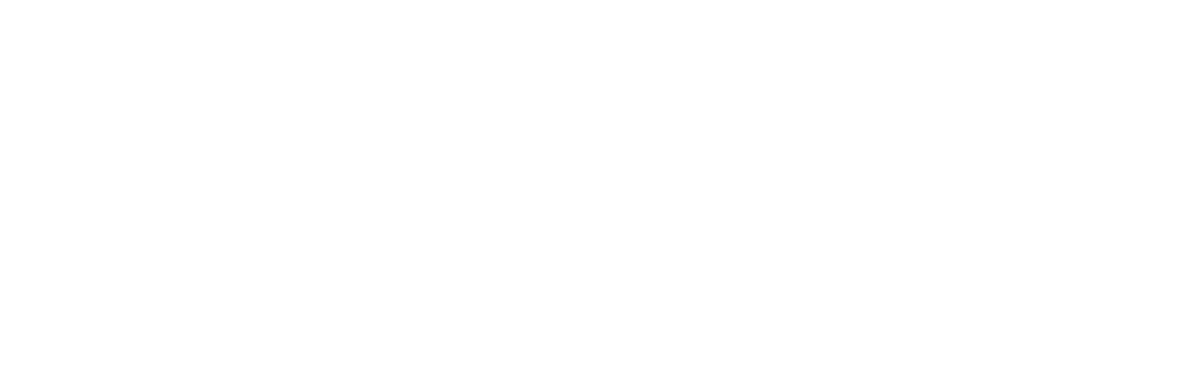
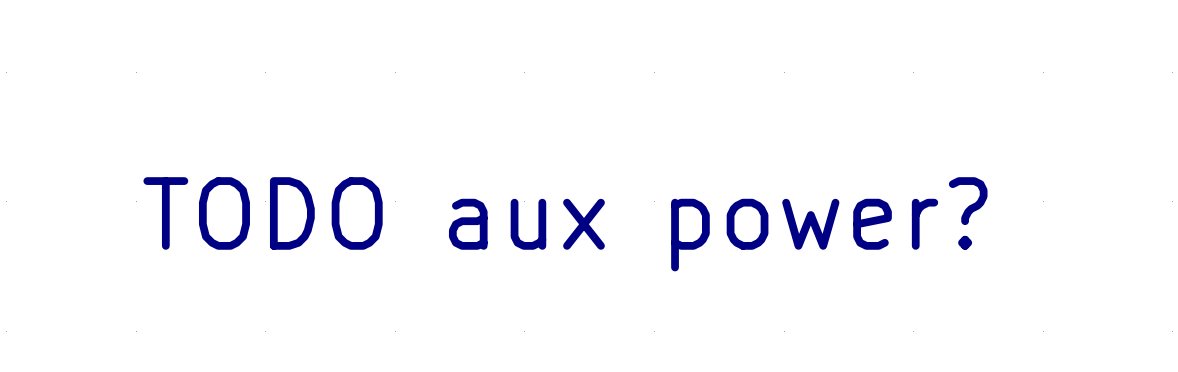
text: none -> TODO aux power? (565, 224)

